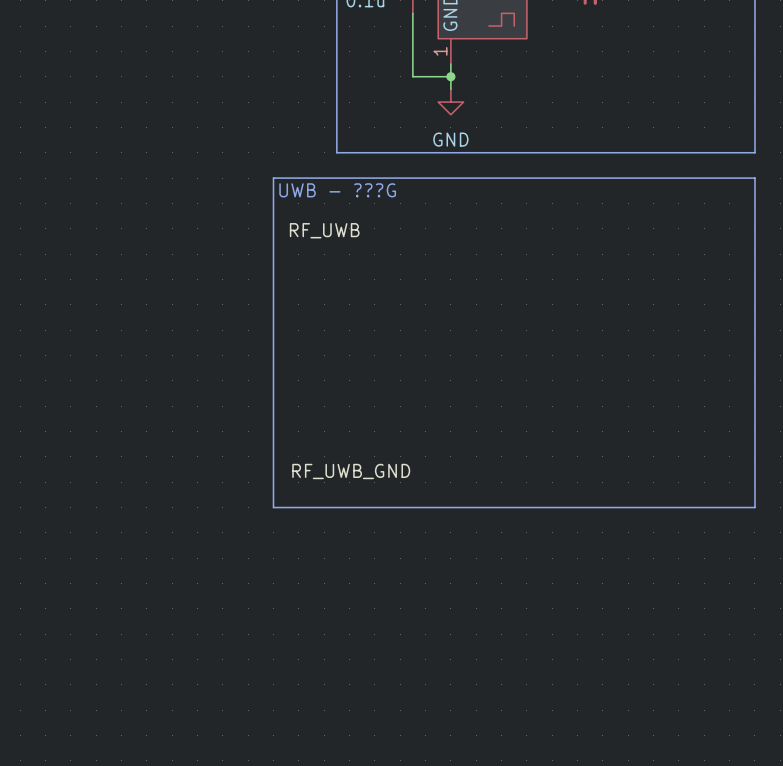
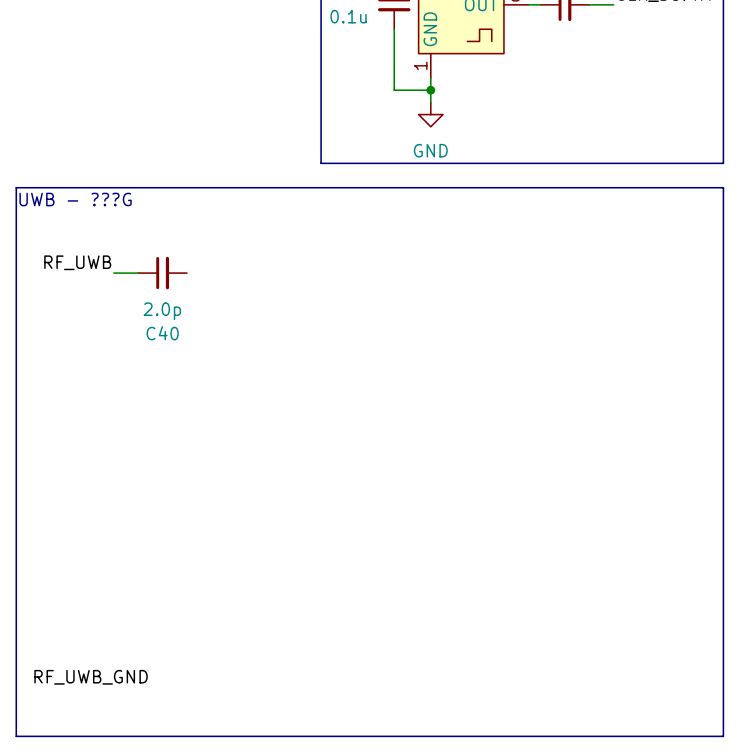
line: (273, 178) (273, 507) (754, 507) -> (260, 187) (16, 187) (16, 736) (723, 736) (723, 504)
text: none -> UWB - ???G (75, 199)
text: UWB - ???G (337, 190) -> none
label position: RF_UWB (324, 230) -> RF_UWB (77, 262)
wire: none -> (113, 273) (138, 273)
C40: none -> 2.0p (162, 273)
label: RF_UWB_GND (351, 471) -> none
label: none -> RF_UWB_GND (91, 677)

